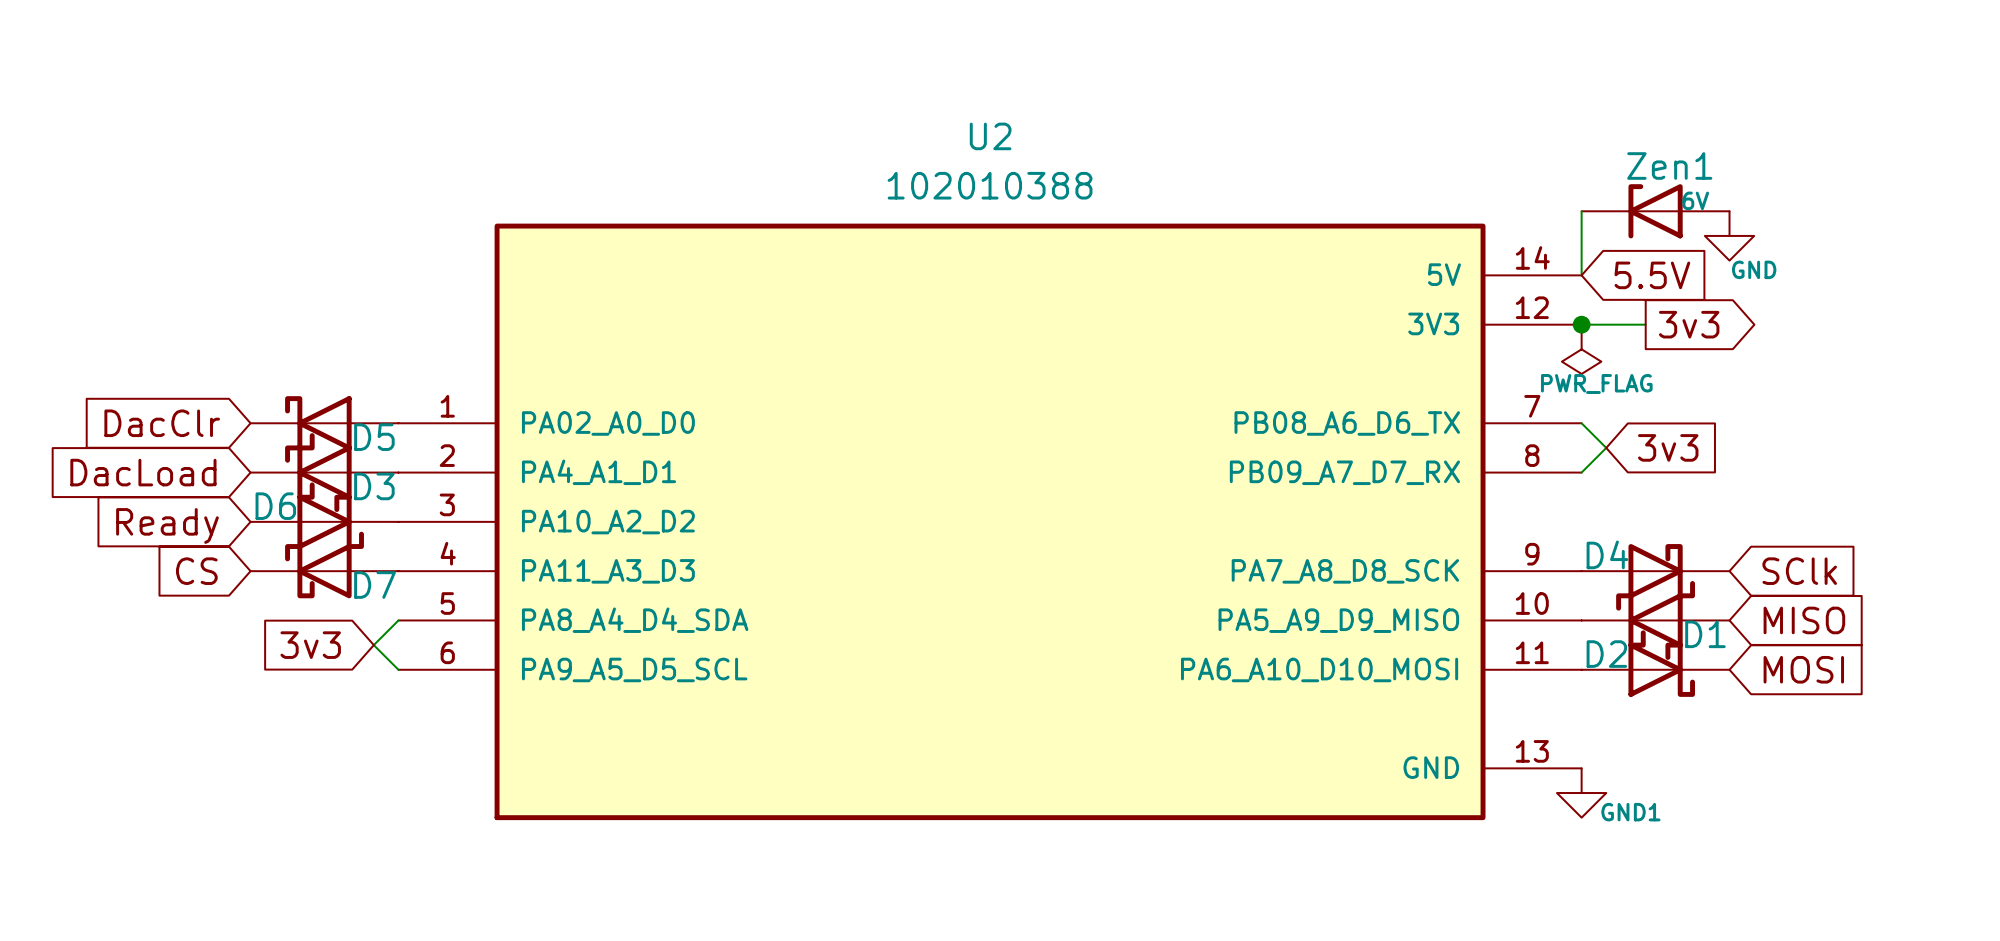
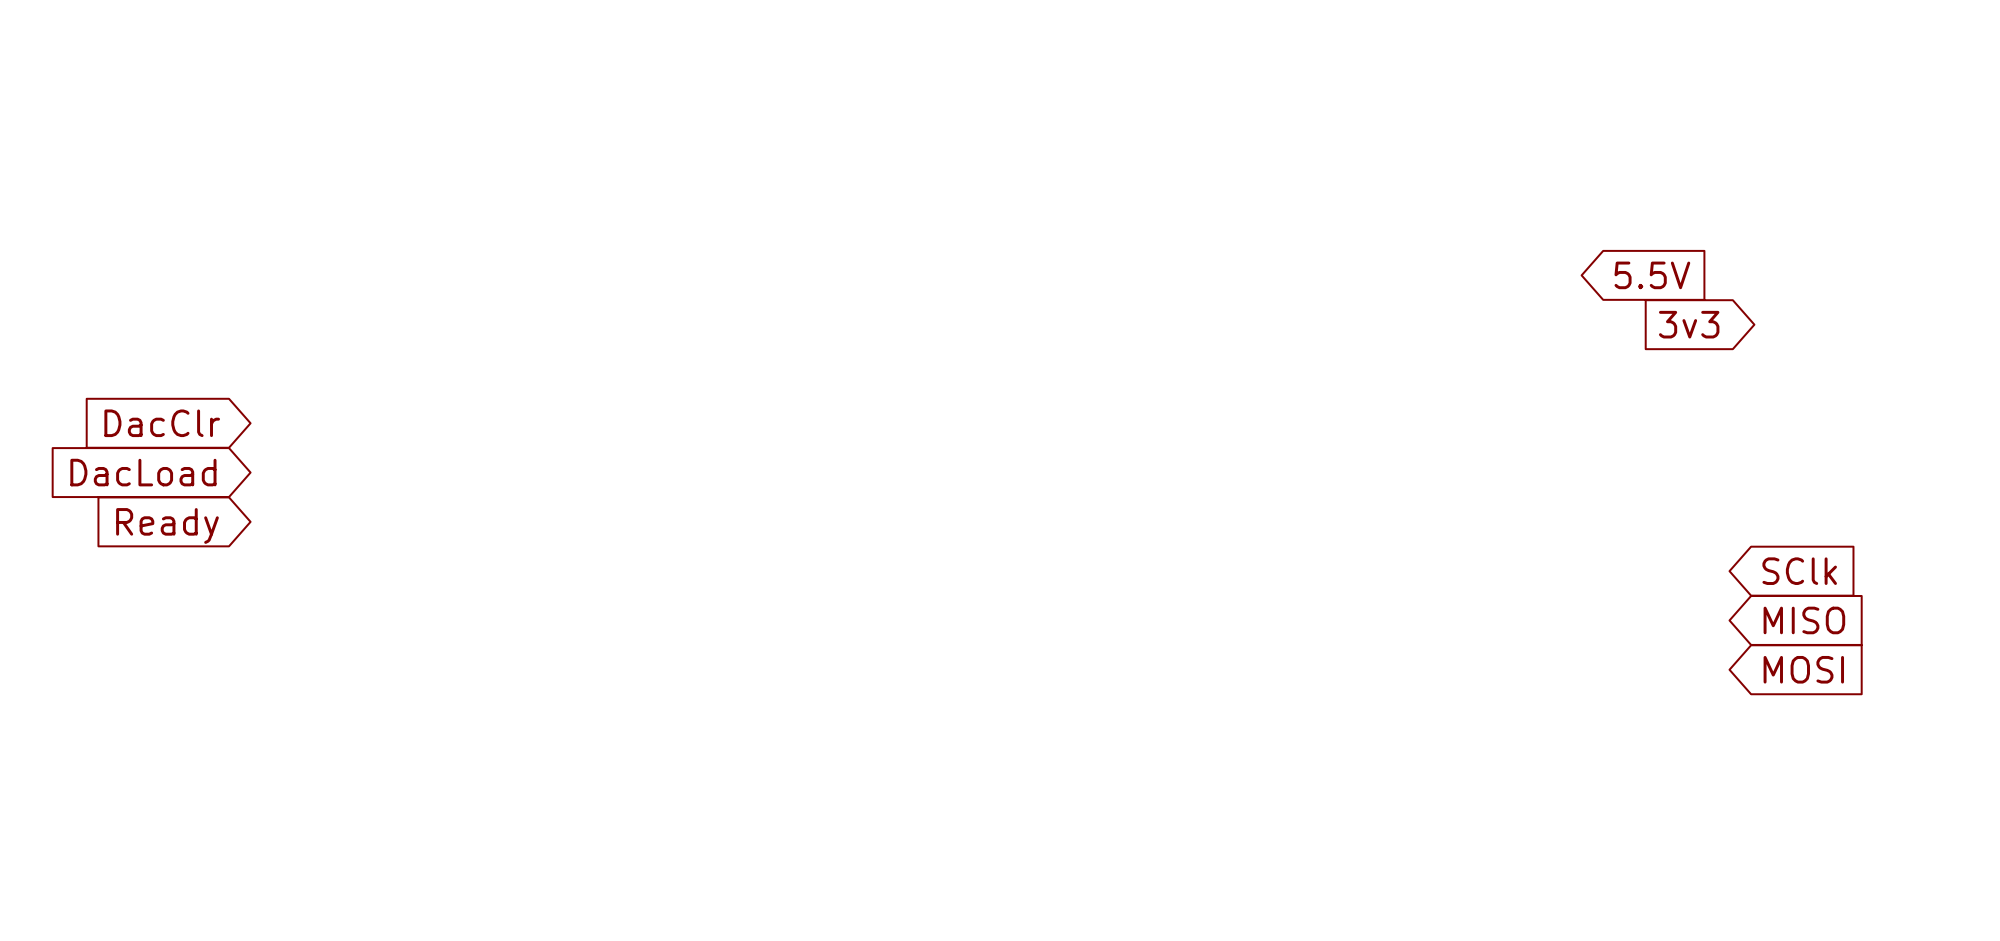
wire: (1581, 211) (1581, 275) -> none
Zen1: 6V (1655, 211) -> none
power symbol: GND (1729, 235) -> none
wire: (1581, 324) (1645, 324) -> none
junction: (1581, 324) -> none
power symbol: PWR_FLAG (1581, 349) -> none
D5: (324, 423) -> none
wire: (1581, 423) (1606, 447) (1581, 472) -> none
global label: 3v3 (1668, 447) -> none
D3: (324, 472) -> none
D6: (324, 521) -> none
U2: 102010388 (990, 521) -> none
global label: CS (196, 571) -> none
D7: (324, 571) -> none
D4: (1655, 571) -> none
wire: (398, 620) (373, 645) (398, 669) -> none
D1: (1655, 620) -> none
global label: 3v3 (310, 645) -> none
D2: (1655, 669) -> none
power symbol: GND1 (1581, 793) -> none

